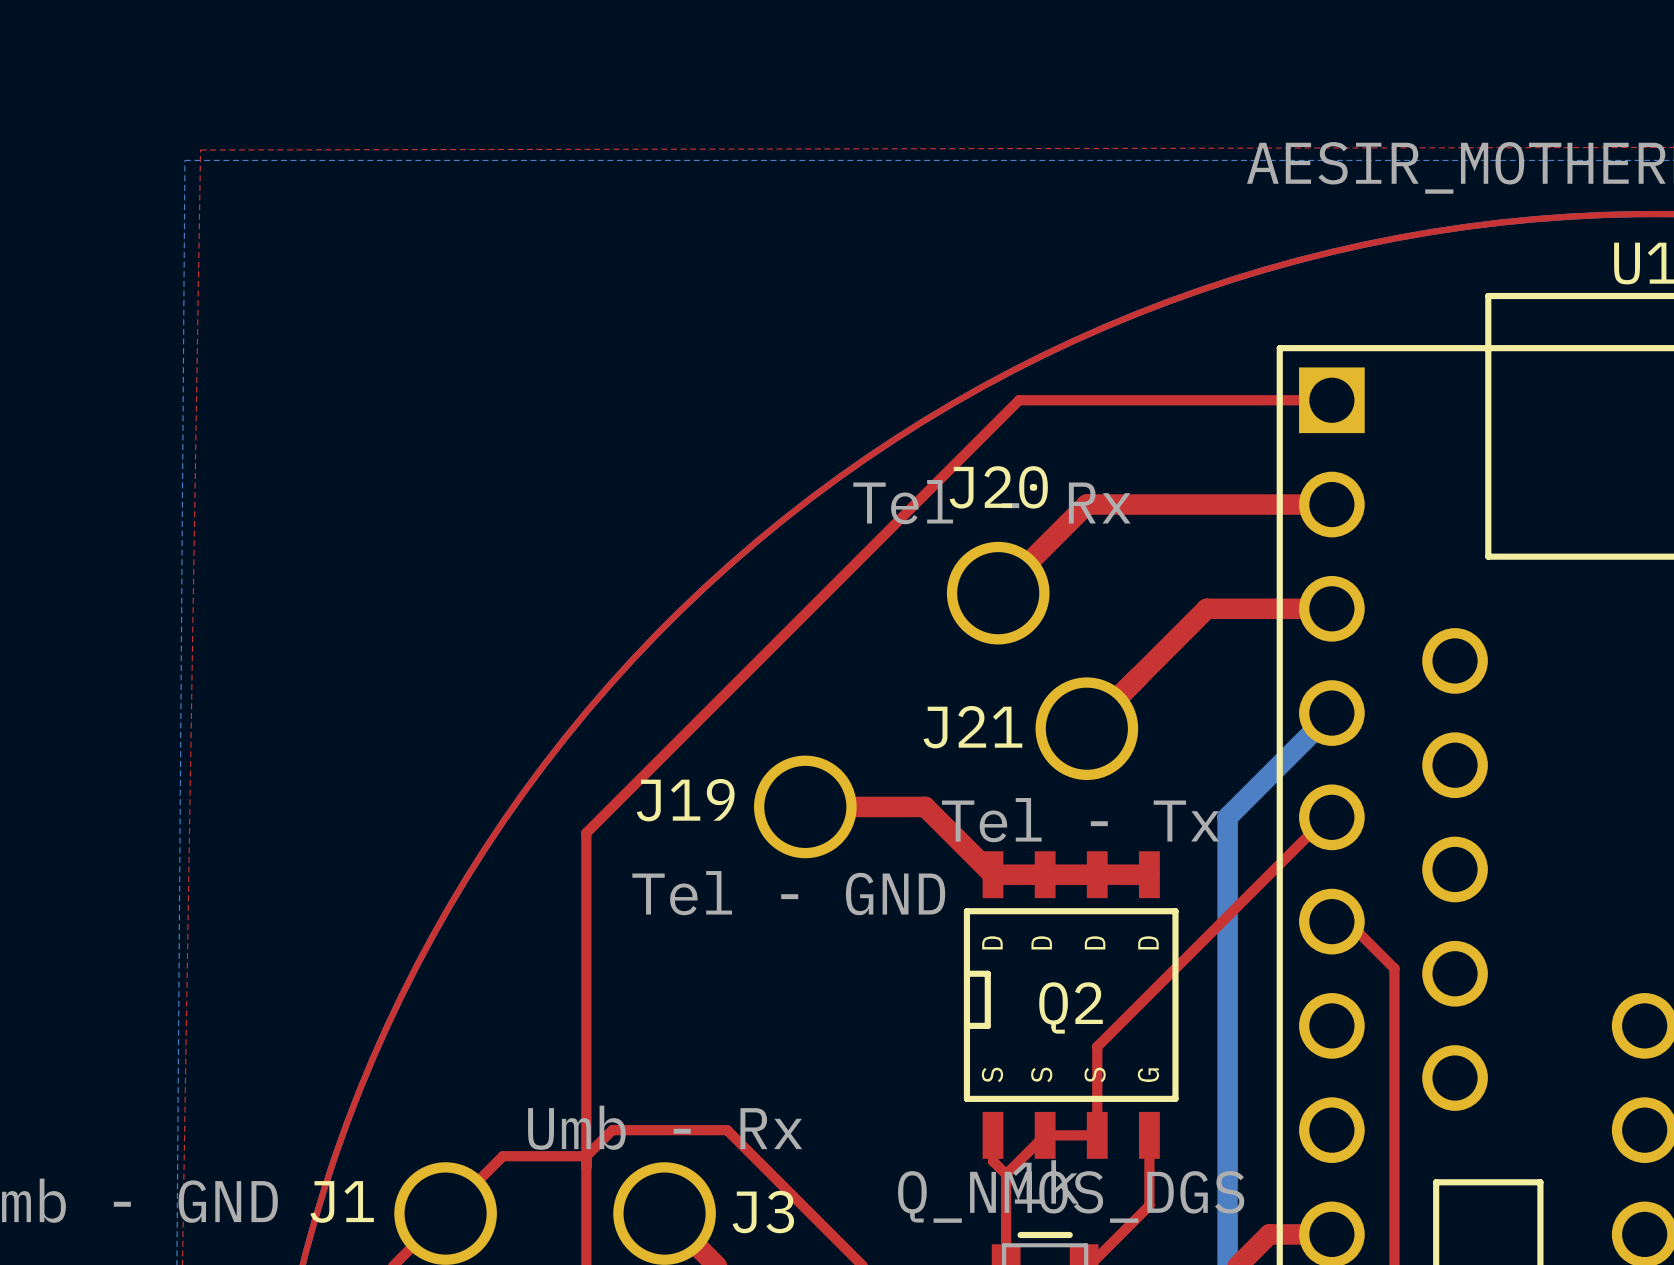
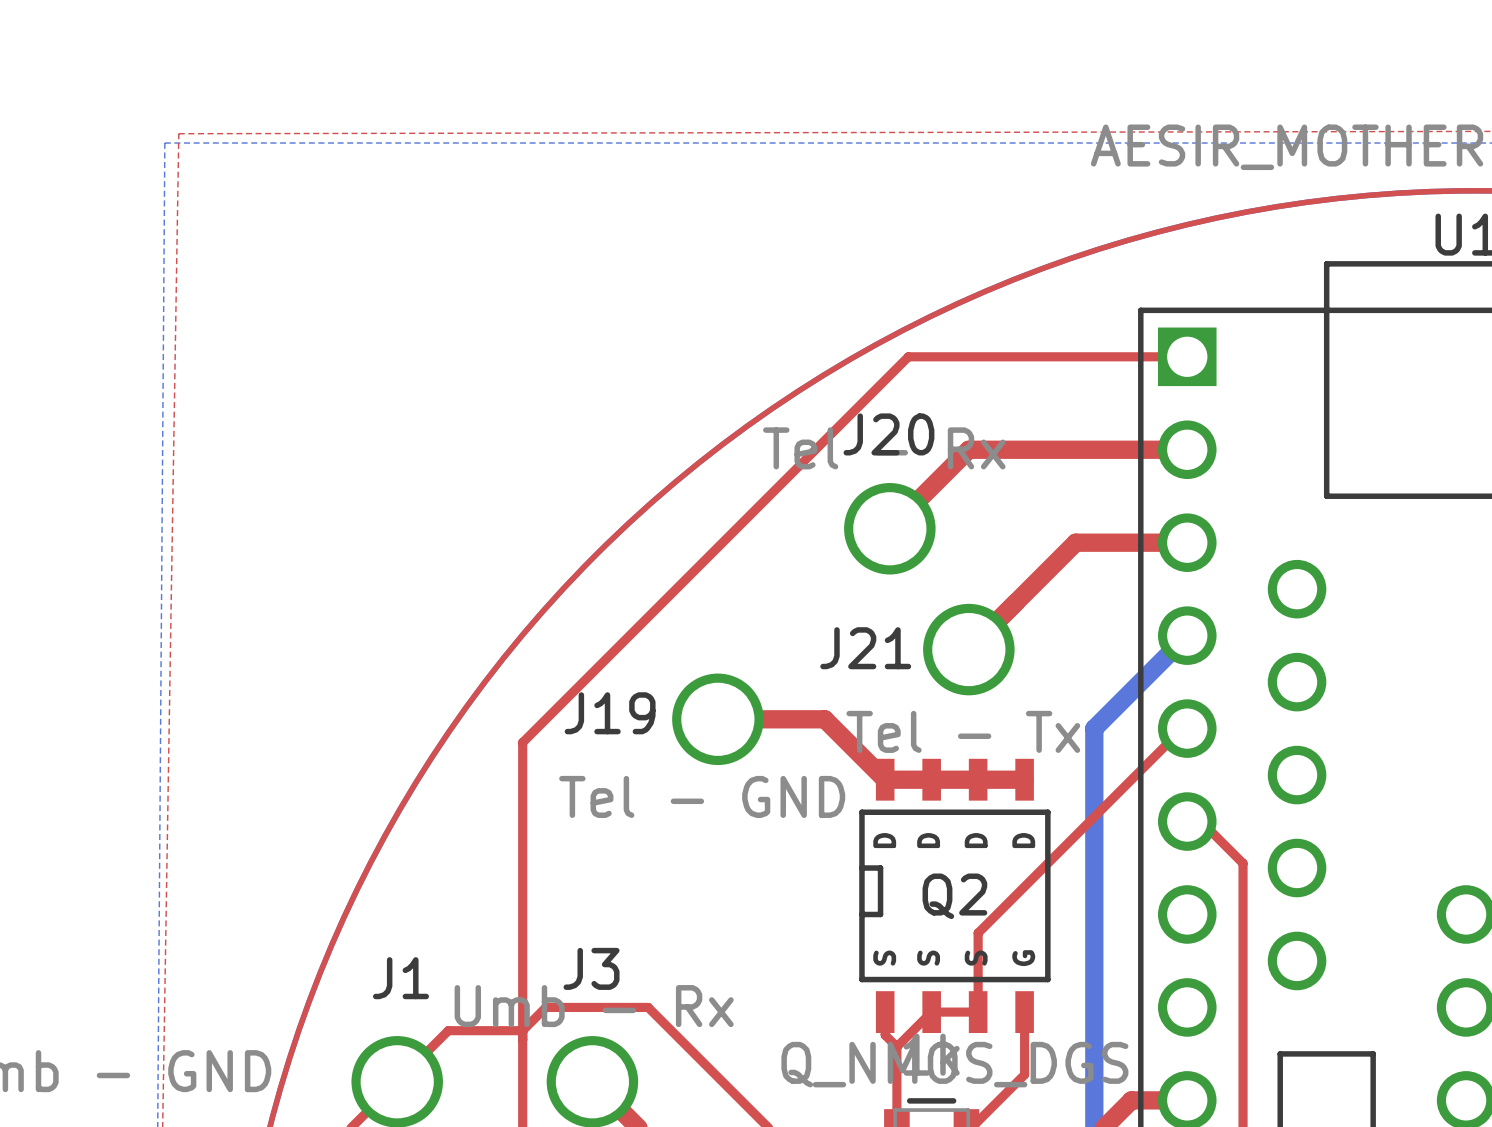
J1 name position: J1 (342, 1201) -> J1 (400, 978)
J3 name position: J3 (763, 1212) -> J3 (591, 968)

